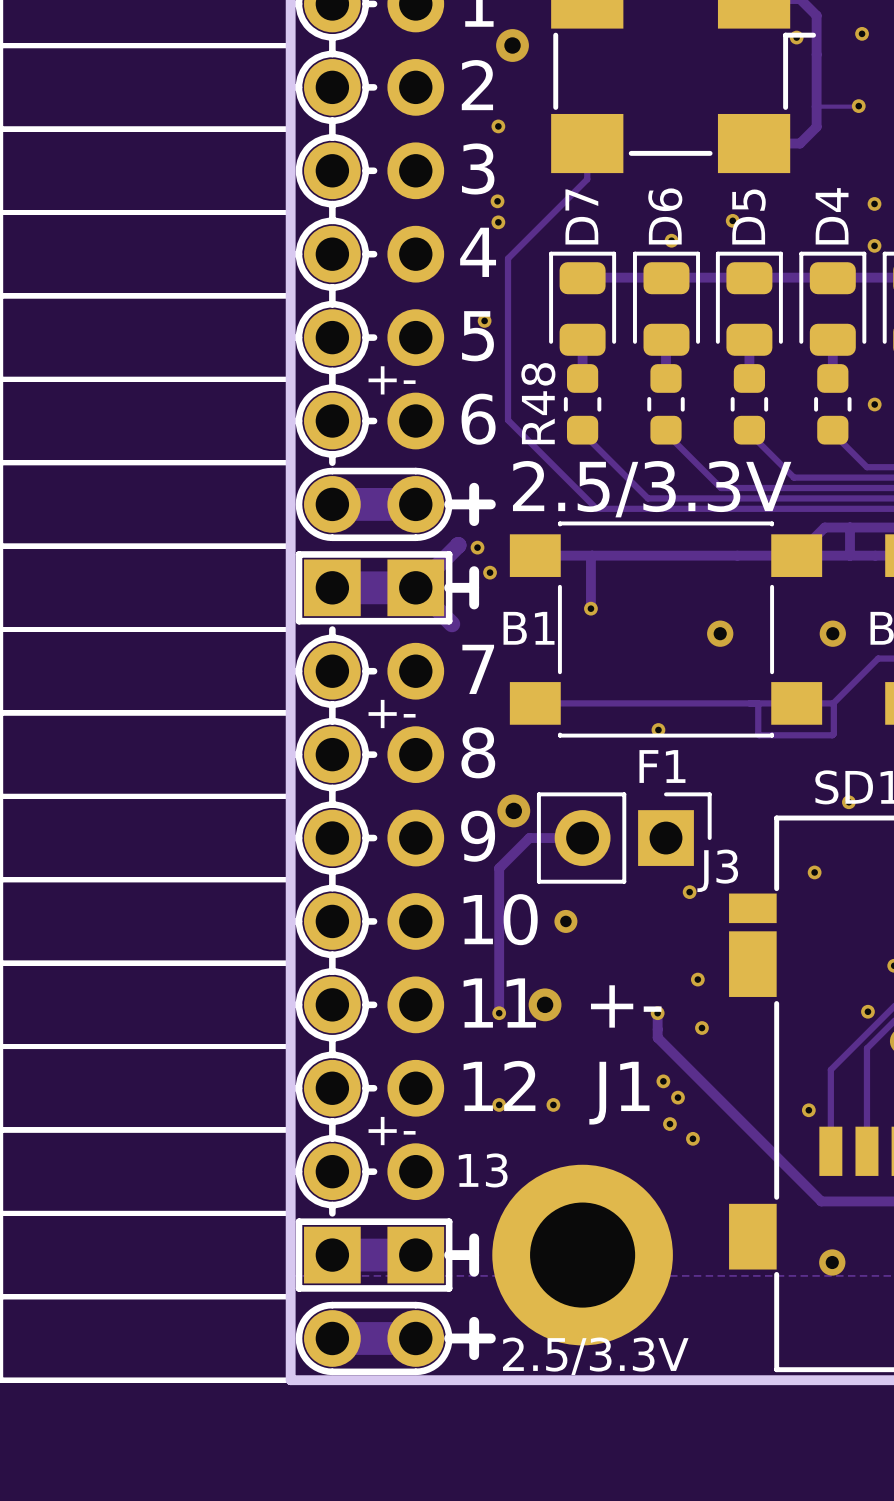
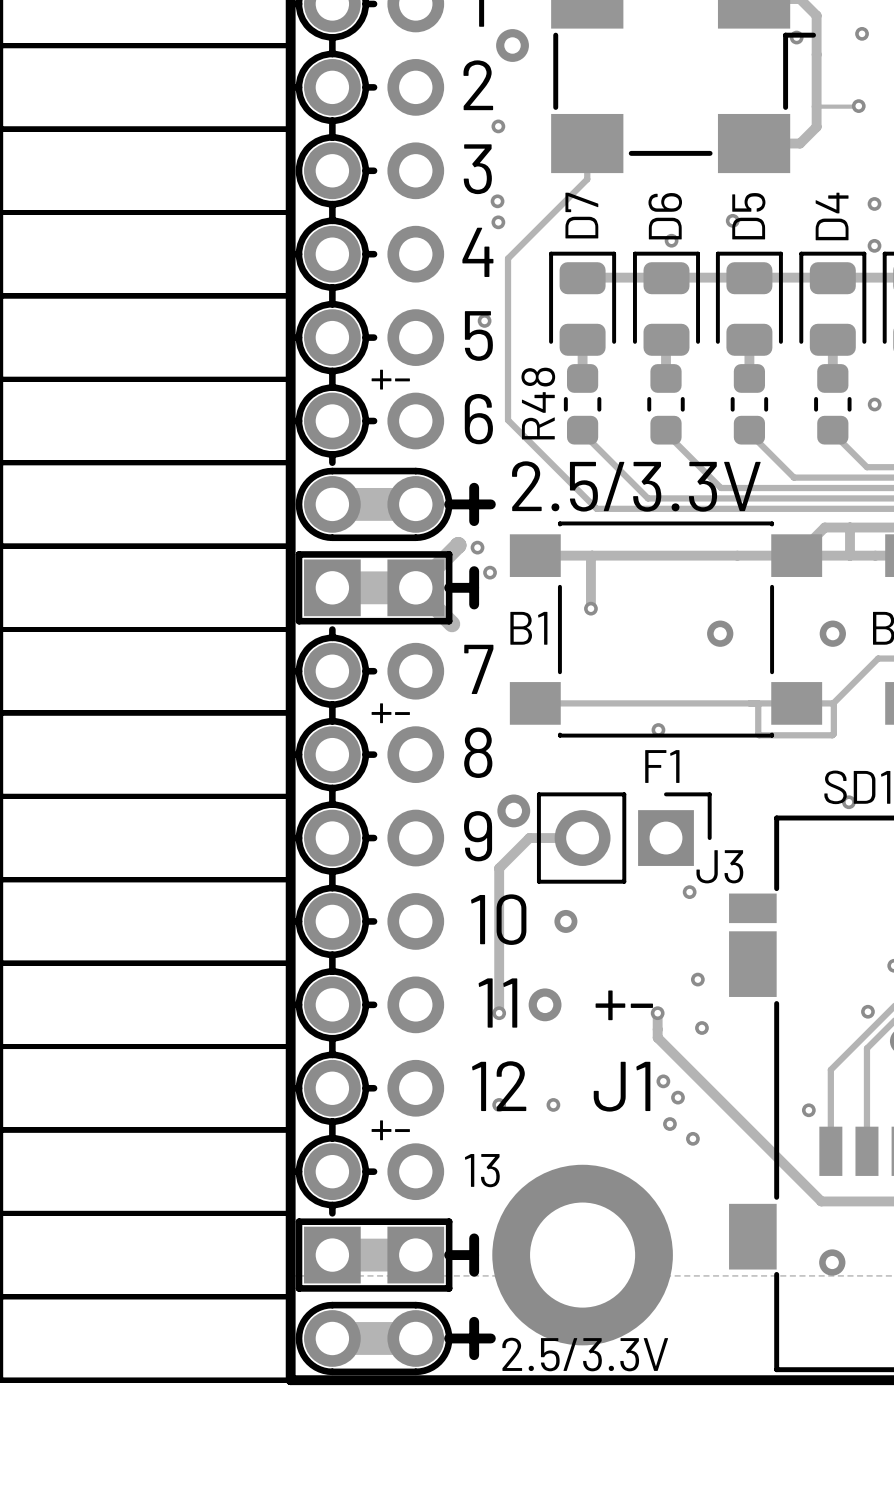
via: (814, 872) -> none

